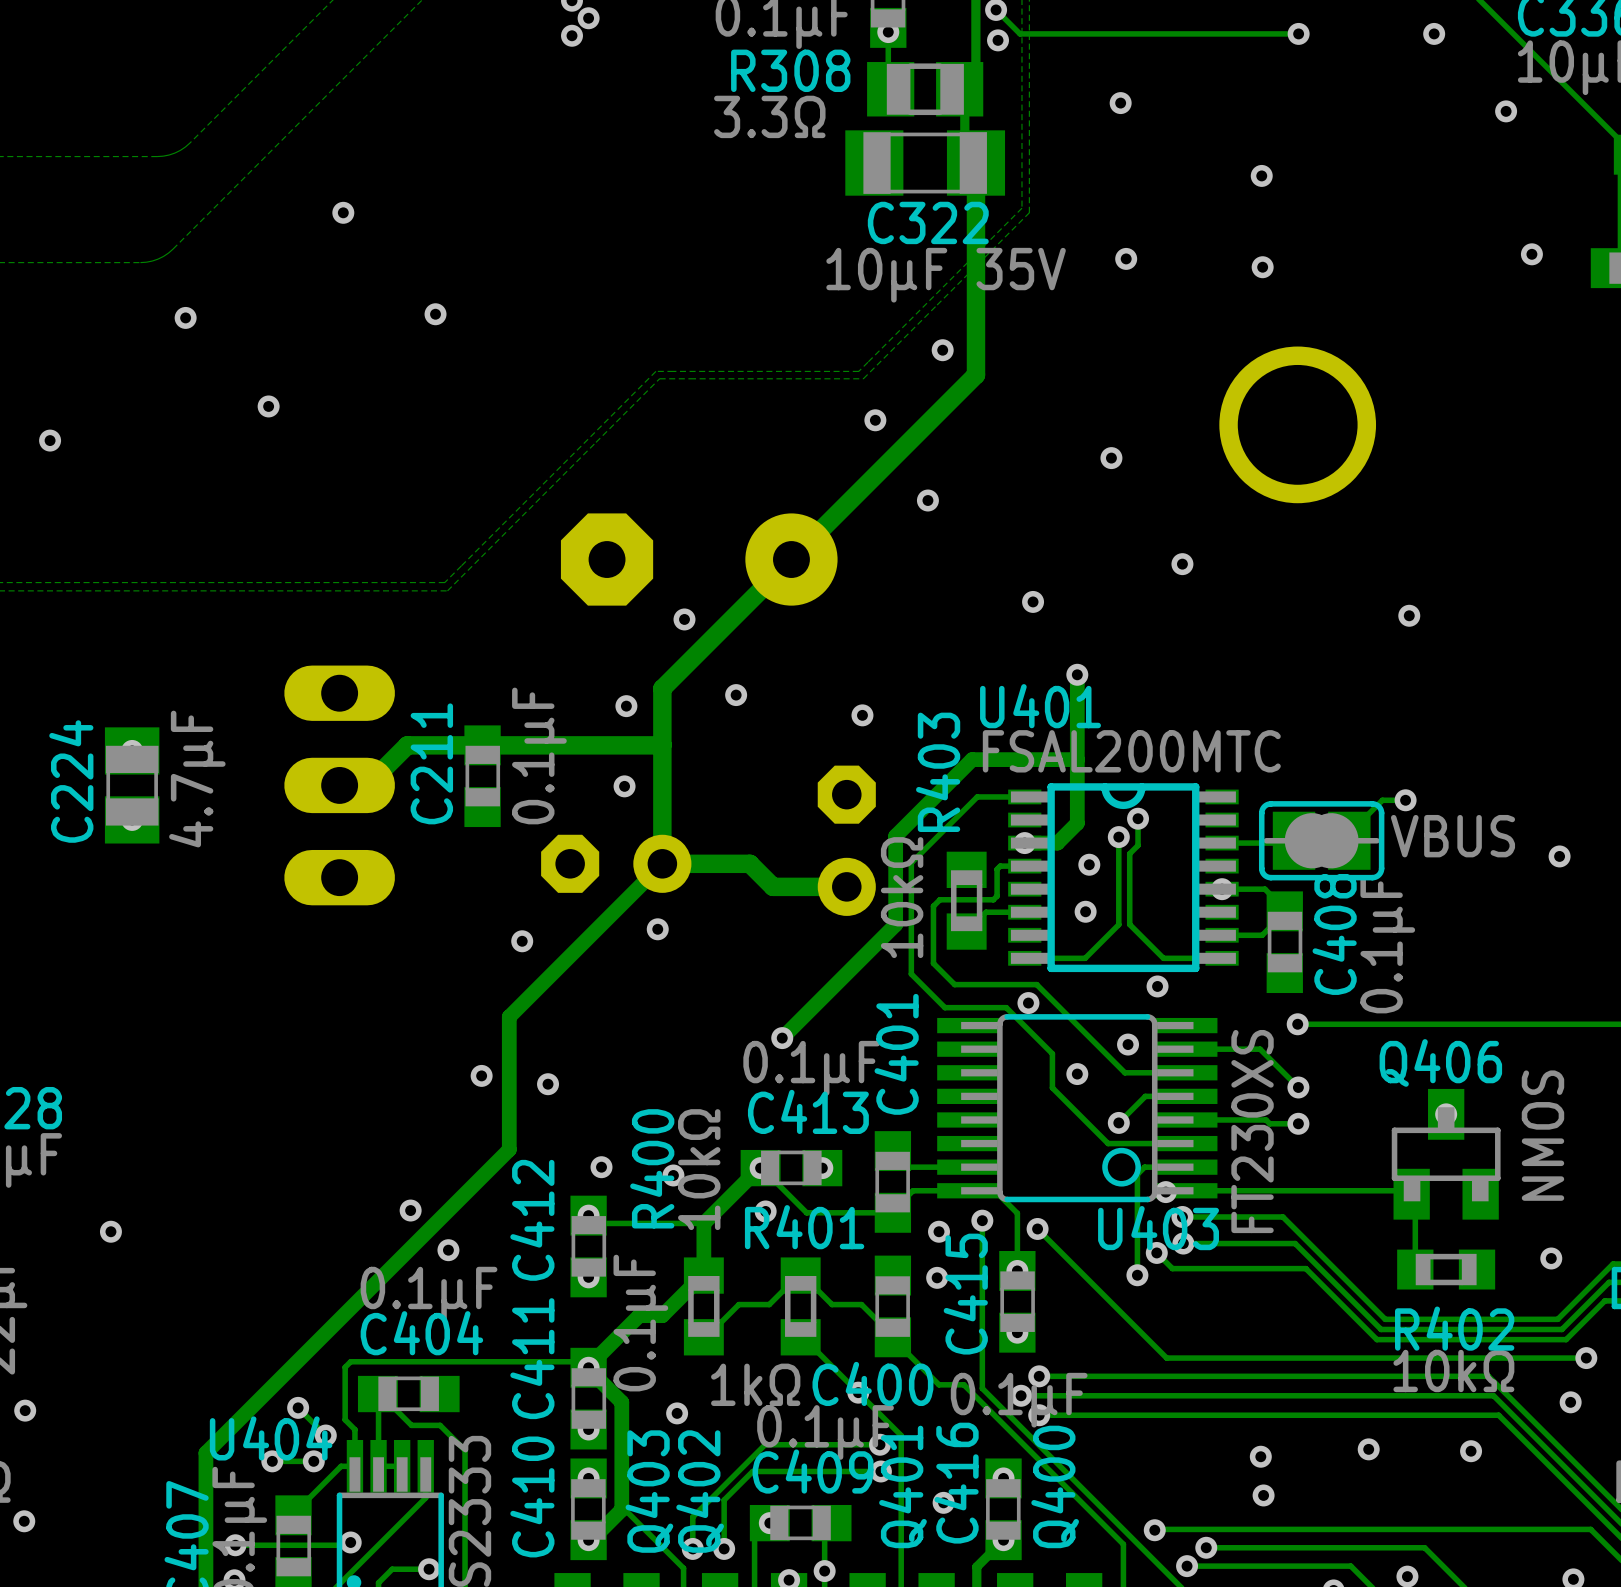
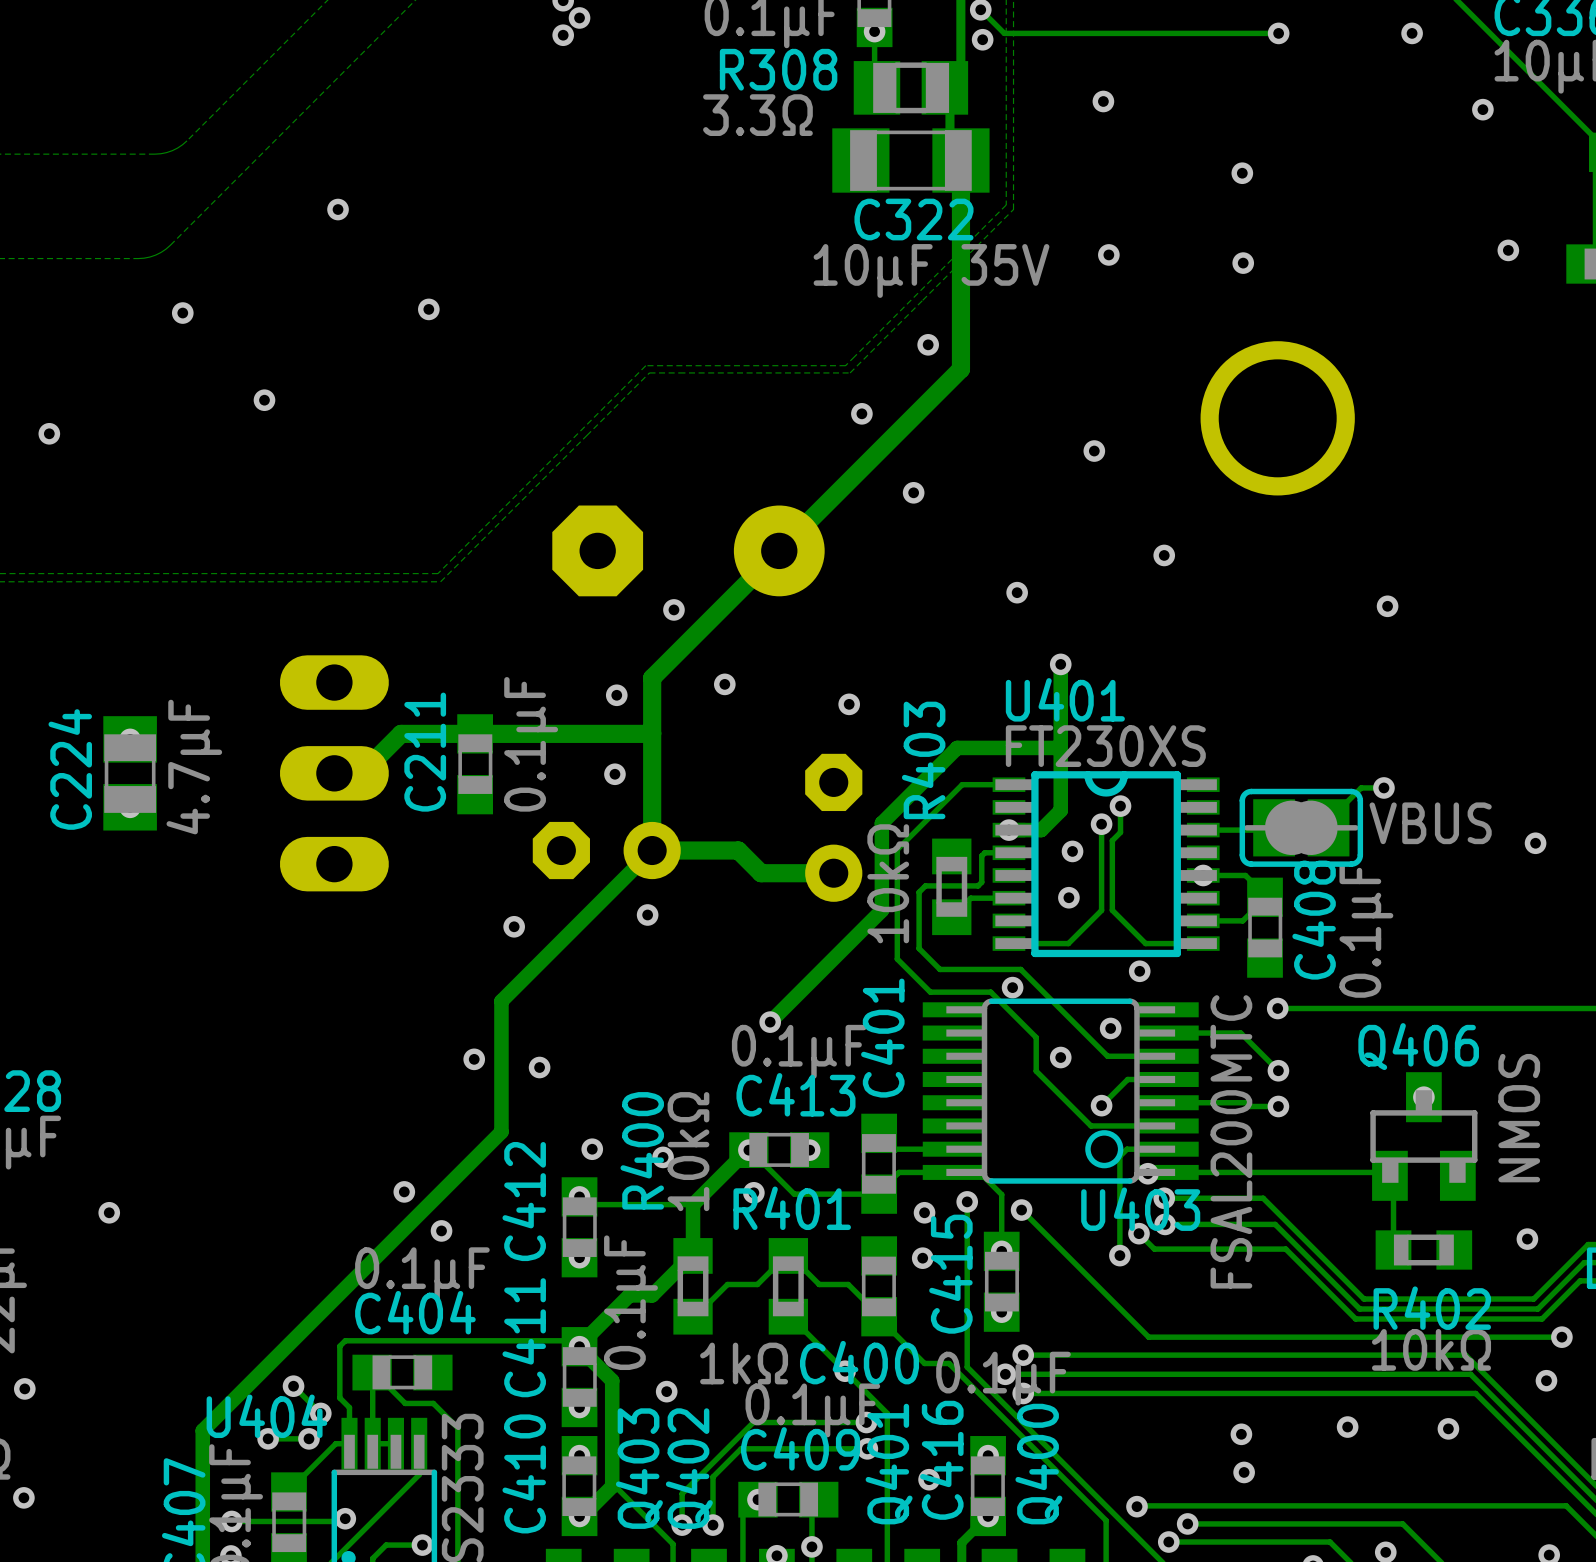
U401 name position: U401 (1040, 706) -> U401 (1065, 699)
U403 value rotation: 0° (1131, 751) -> 90° counterclockwise (1231, 1141)
U403 value position: FSAL200MTC (1131, 751) -> FSAL200MTC (1231, 1141)
U401 value rotation: 0° (1252, 1131) -> 90° clockwise (1105, 746)
U401 value position: FT230XS (1252, 1131) -> FT230XS (1105, 746)

